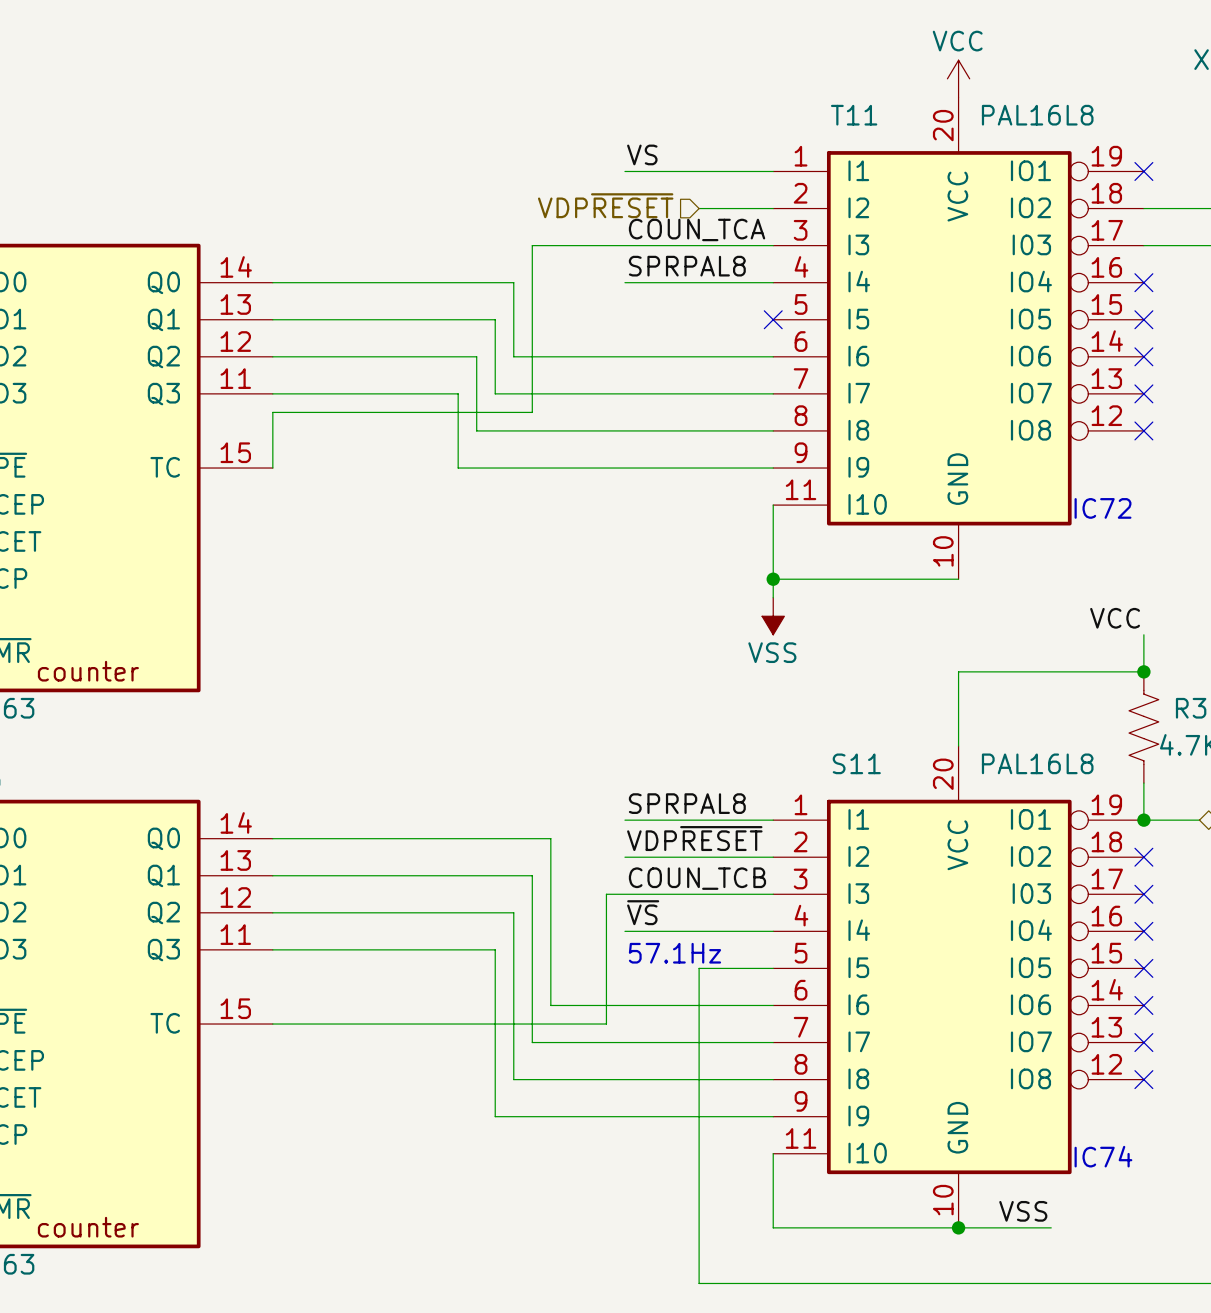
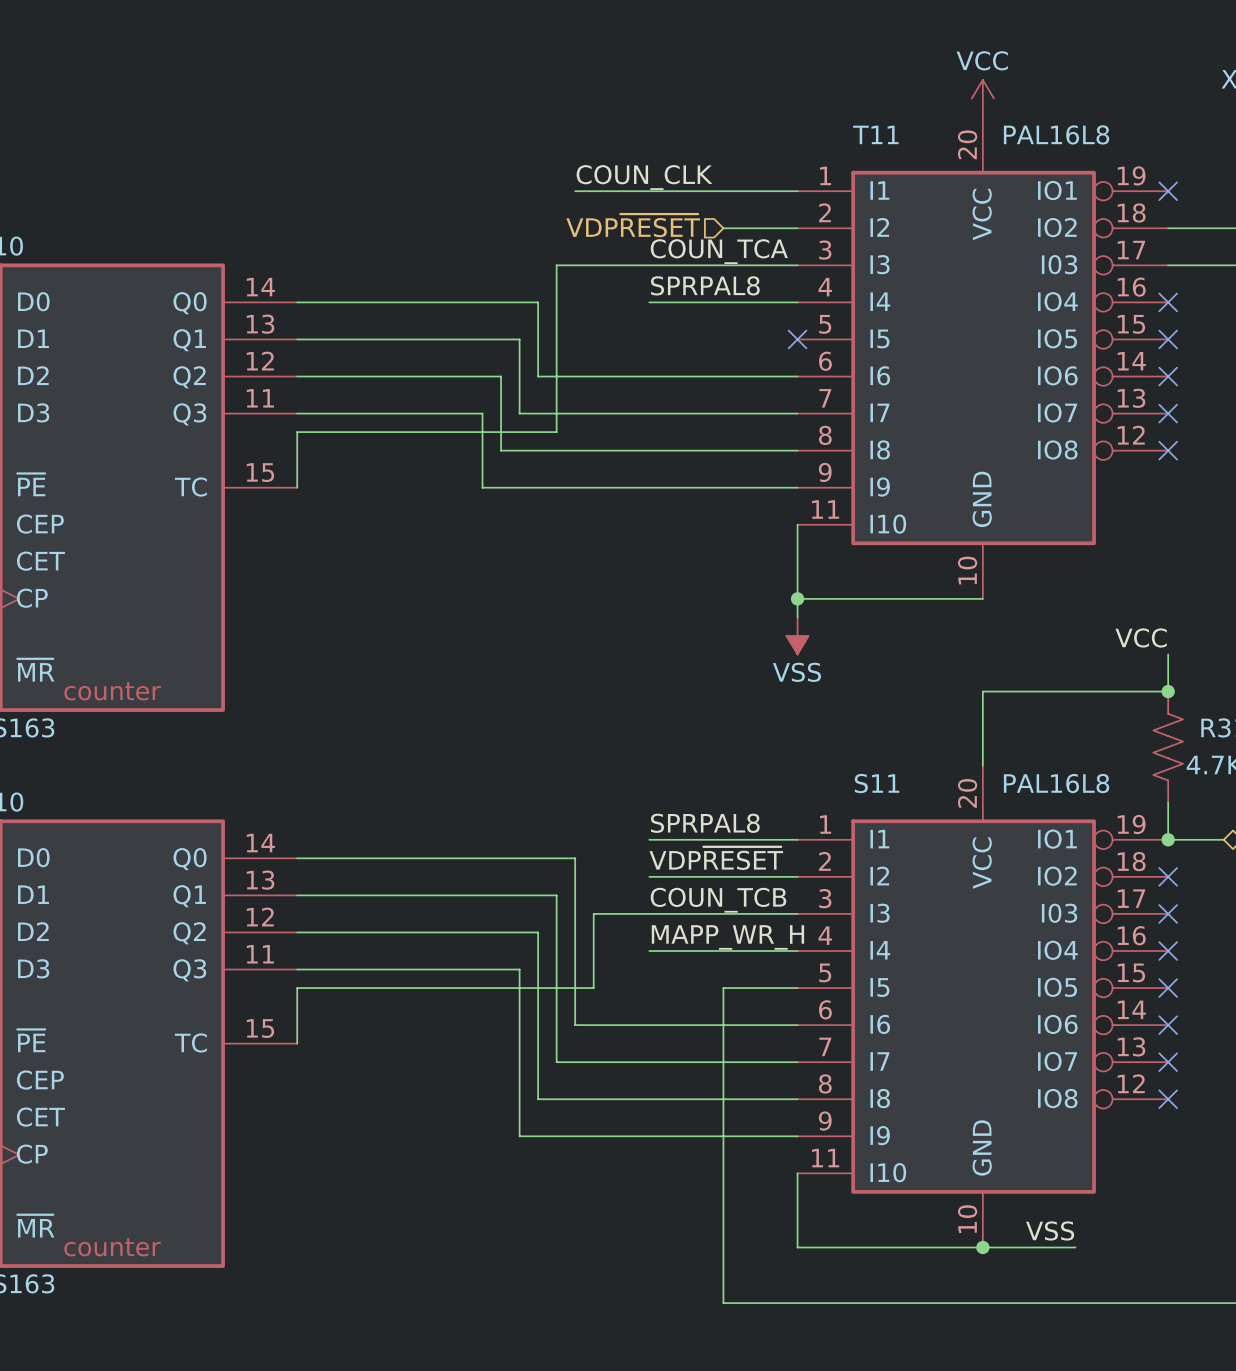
label: VS (642, 154) -> none
label: none -> COUN_CLK (644, 177)
wire: none -> (575, 191) (649, 191)
text: IC72 (1103, 508) -> none
wire: (606, 894) (606, 1024) (272, 1024) -> (630, 913) (593, 913) (593, 988) (297, 988) (297, 1043)
label: ~{VS} (643, 912) -> MAPP_WR_H (727, 937)
text: 57.1Hz (674, 953) -> none
text: IC74 (1103, 1156) -> none

